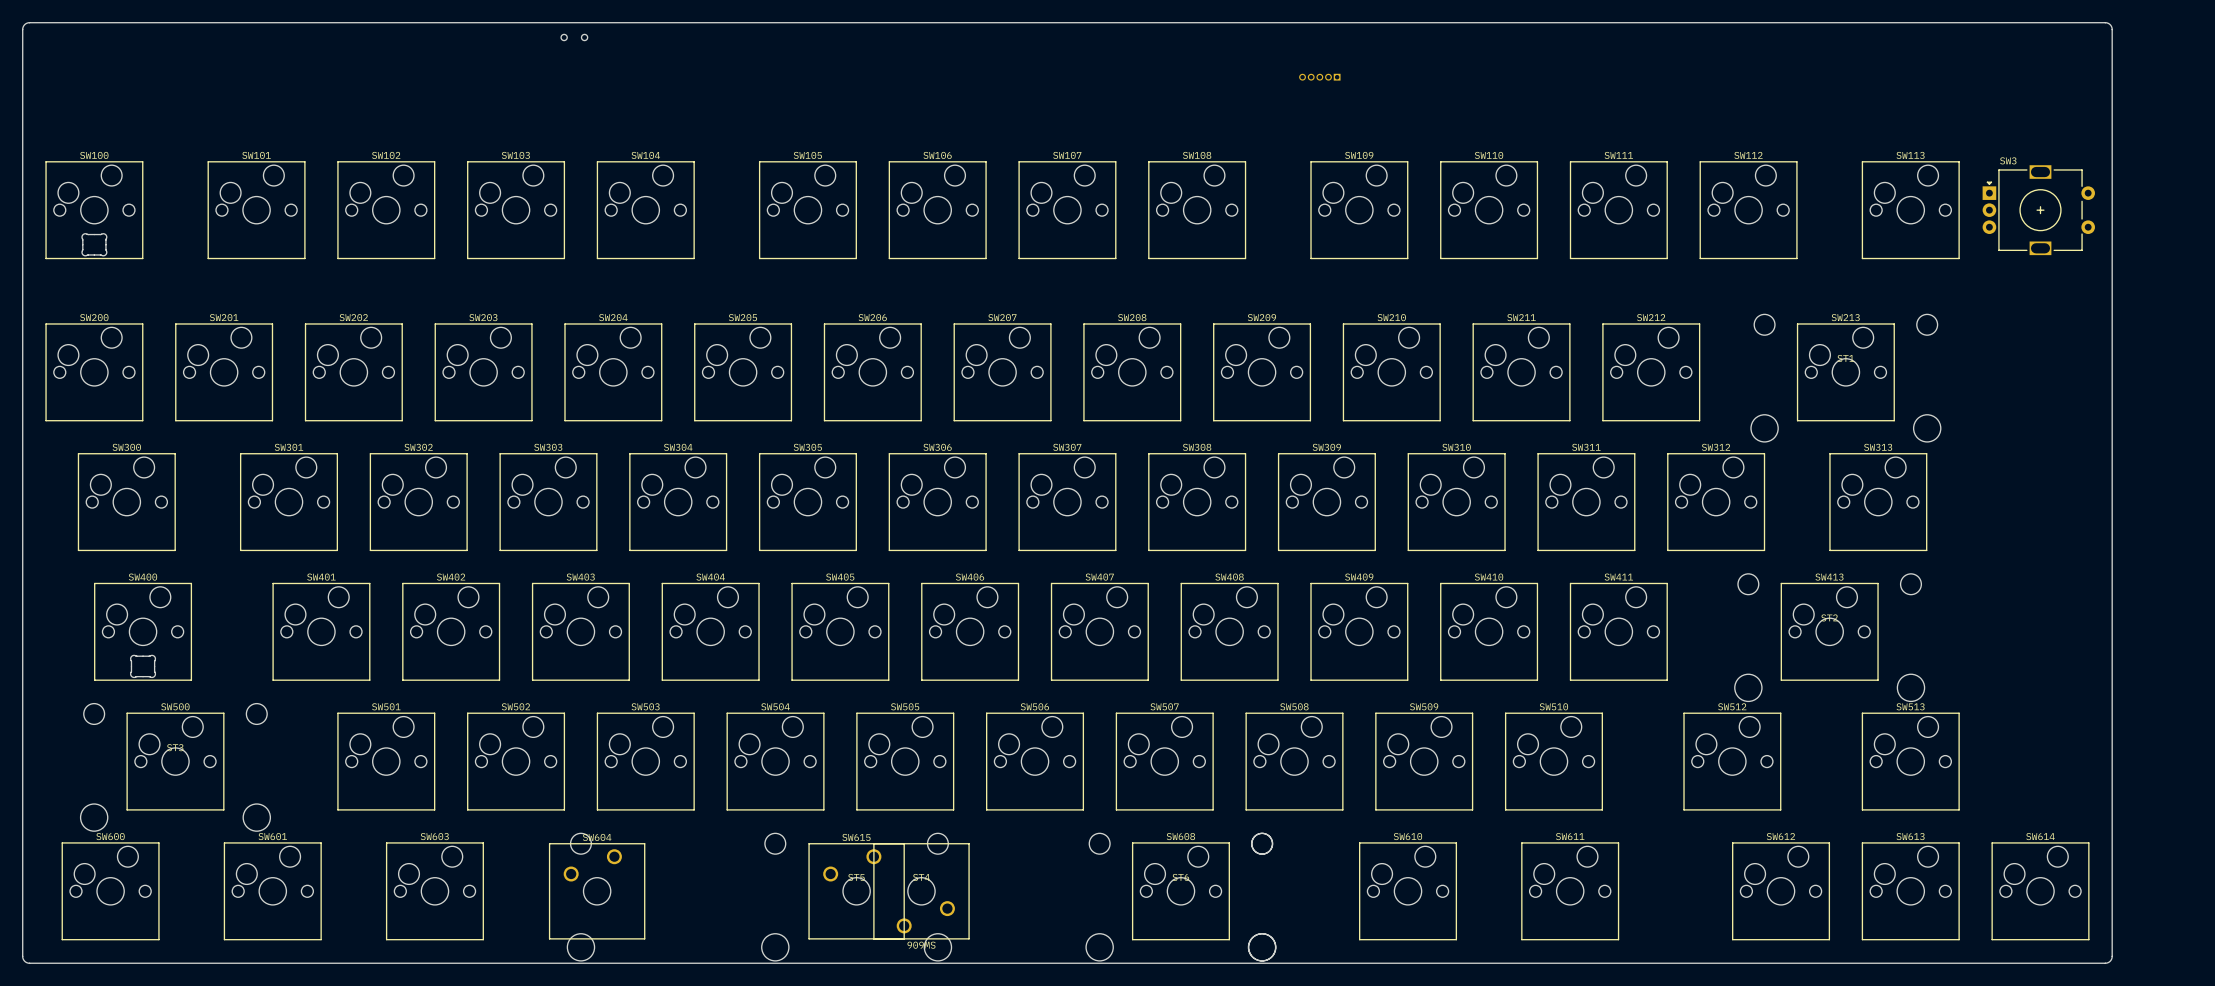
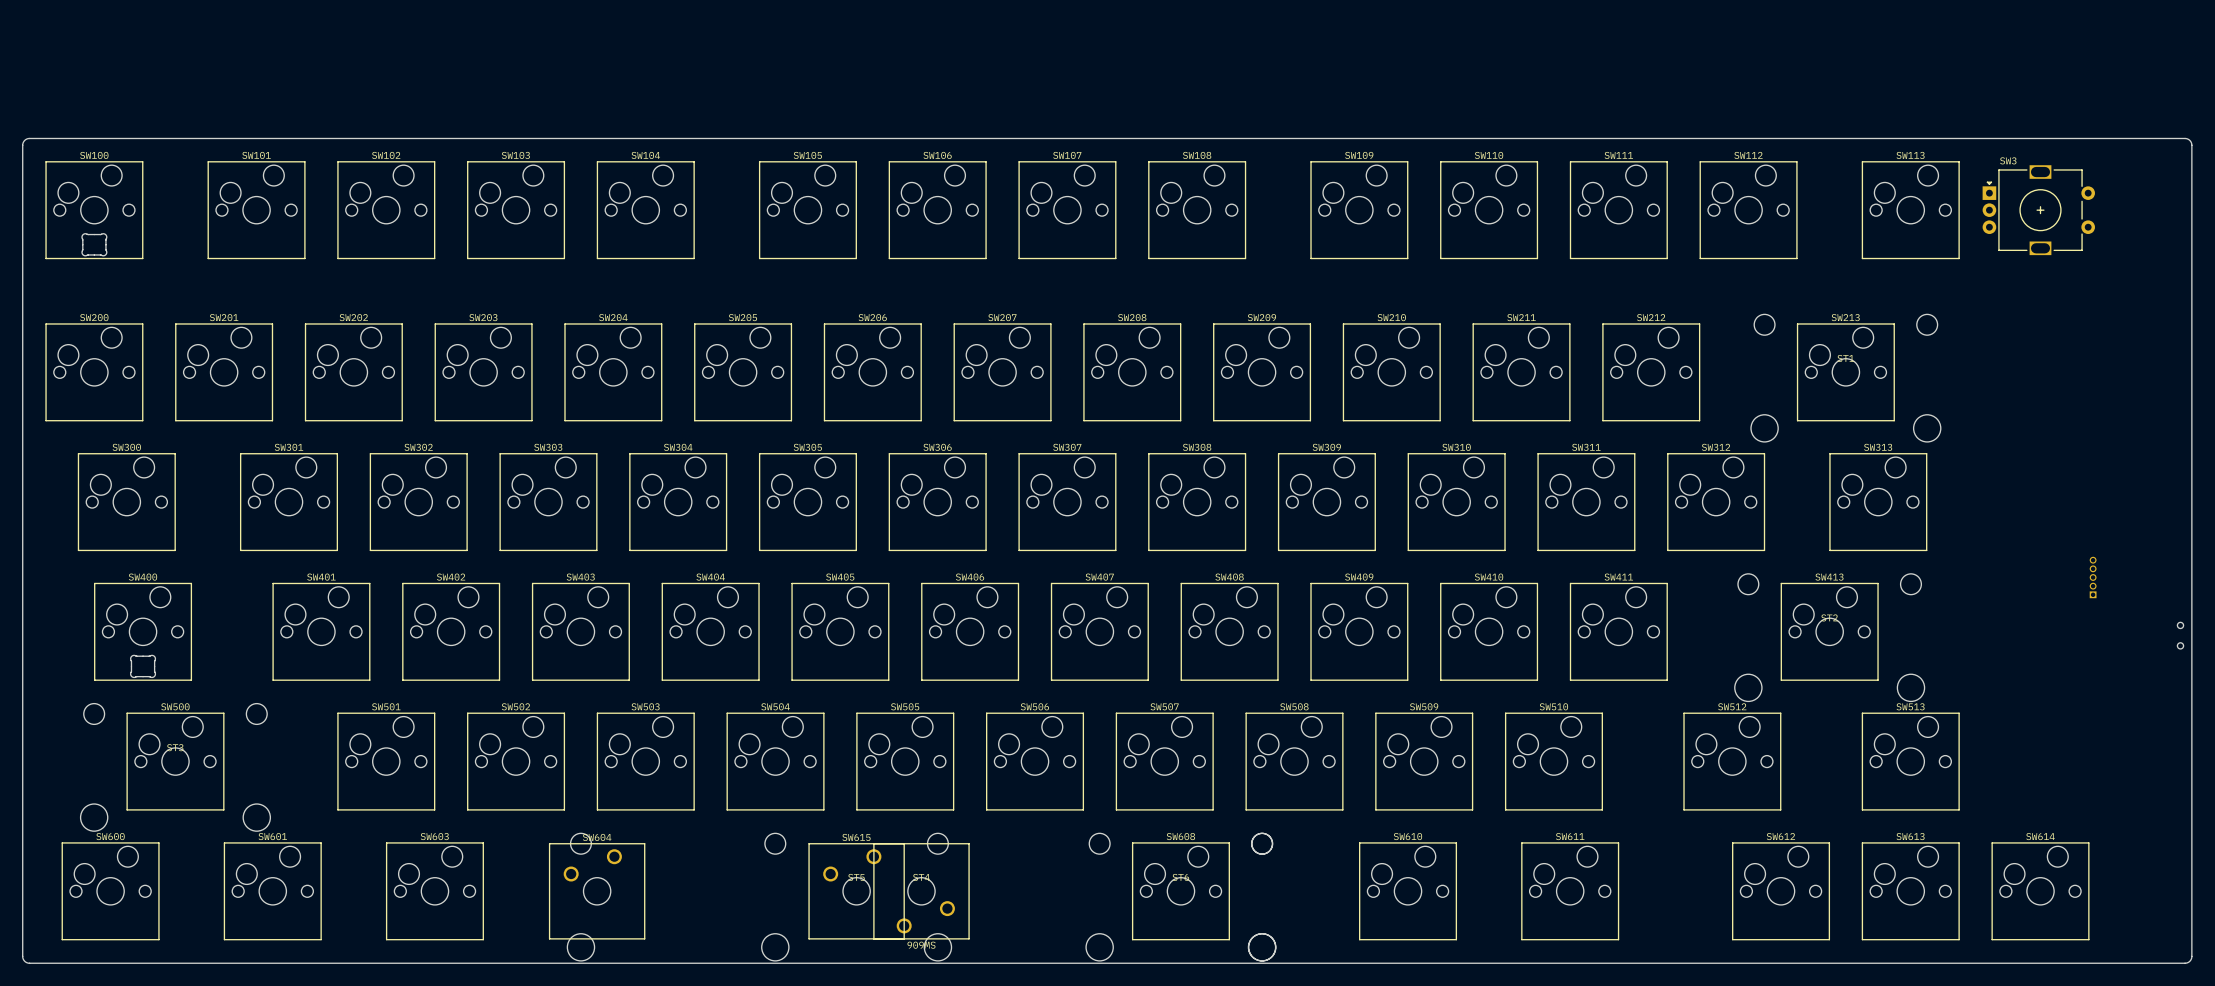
part: (574, 37) -> none
part: (1319, 77) -> none
board edge: (22, 145) (22, 29) (24, 24) (28, 22) (2107, 23) (2112, 29) (2112, 956) (2110, 961) (2105, 963) -> (22, 145) (24, 140) (29, 138) (2187, 139) (2191, 145) (2191, 957) (2185, 963) (2105, 963)
part: none -> (2093, 577)
part: none -> (2180, 635)

